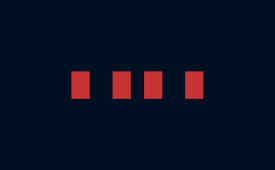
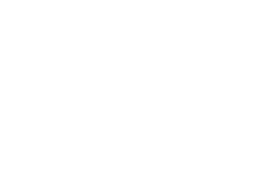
part: (101, 85) -> none
part: (173, 85) -> none

